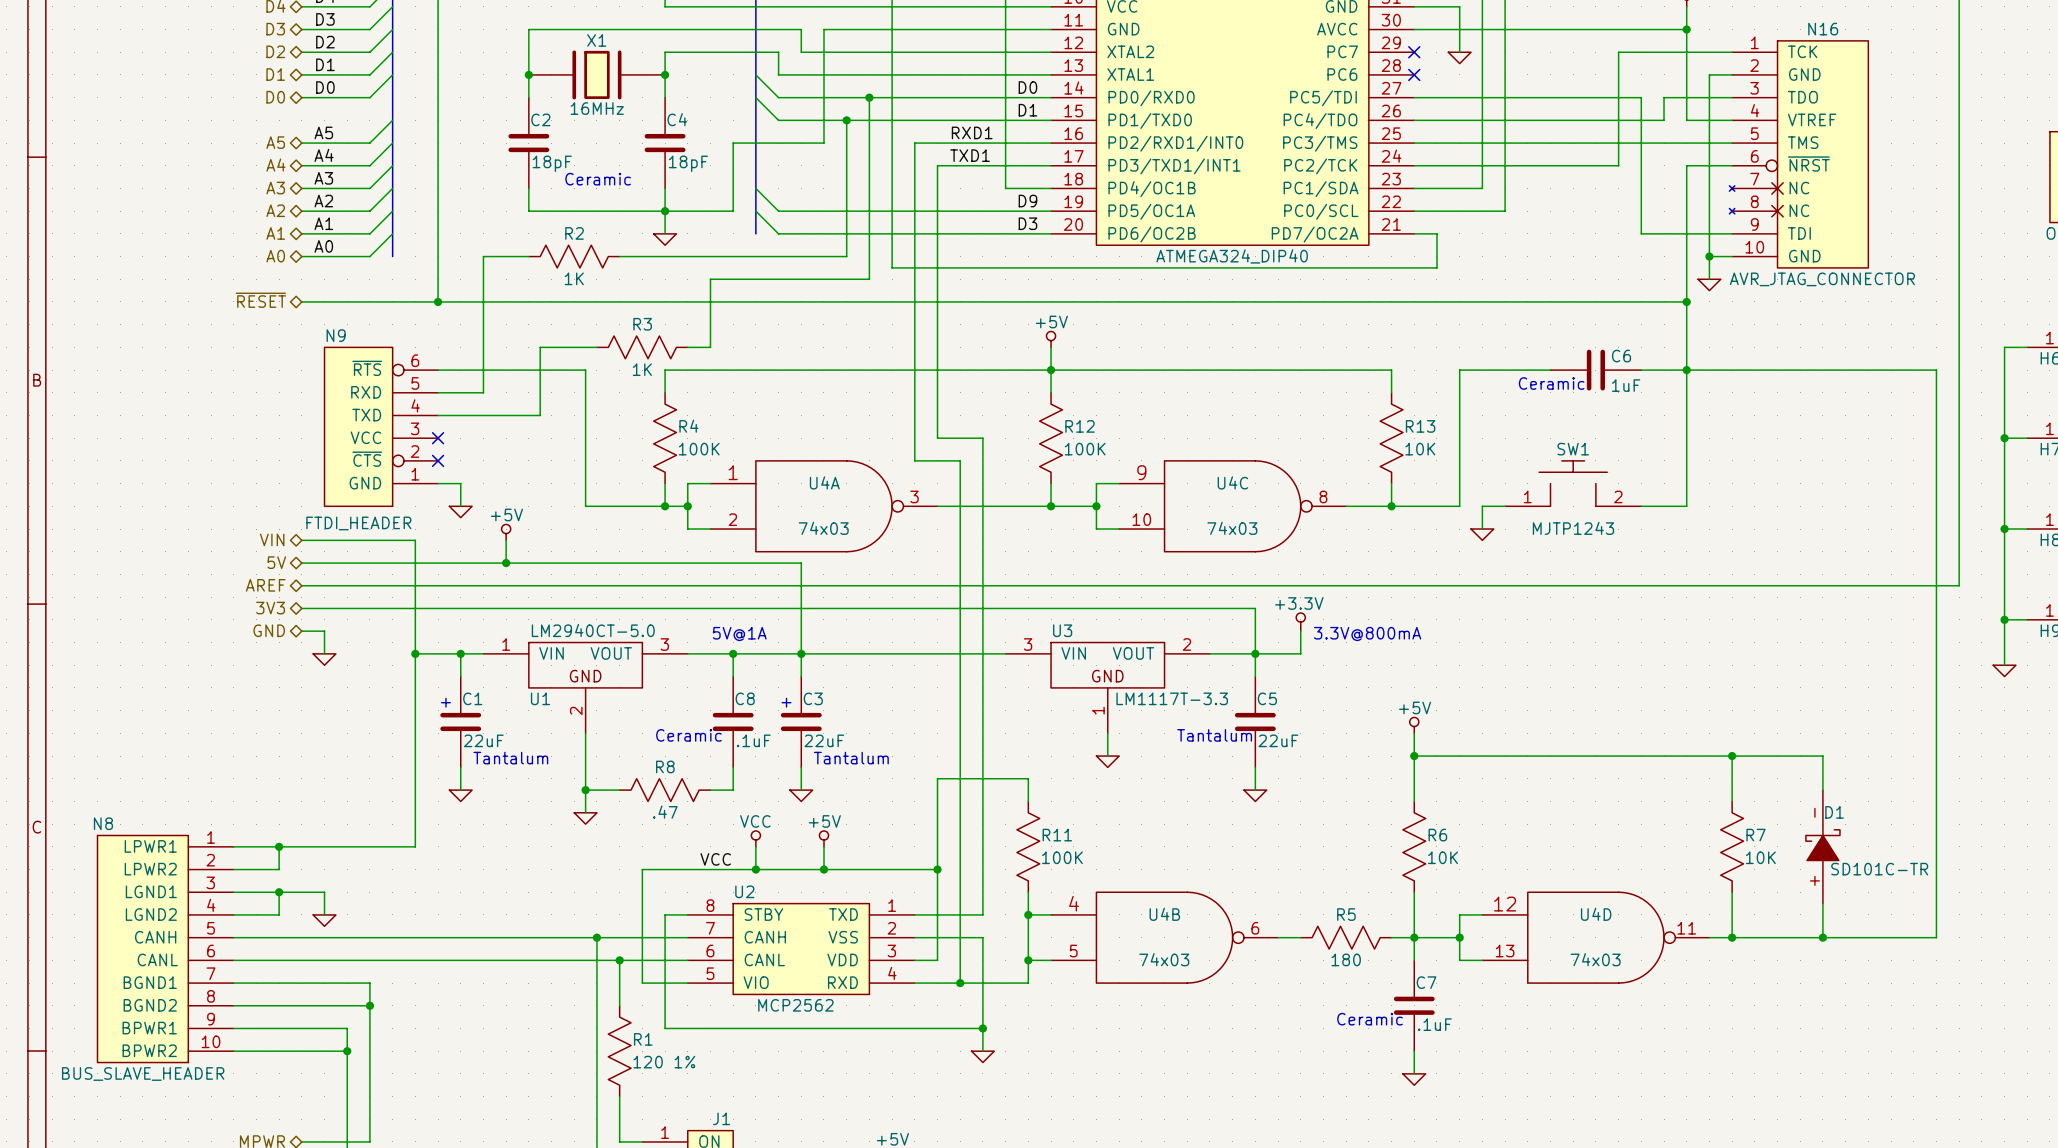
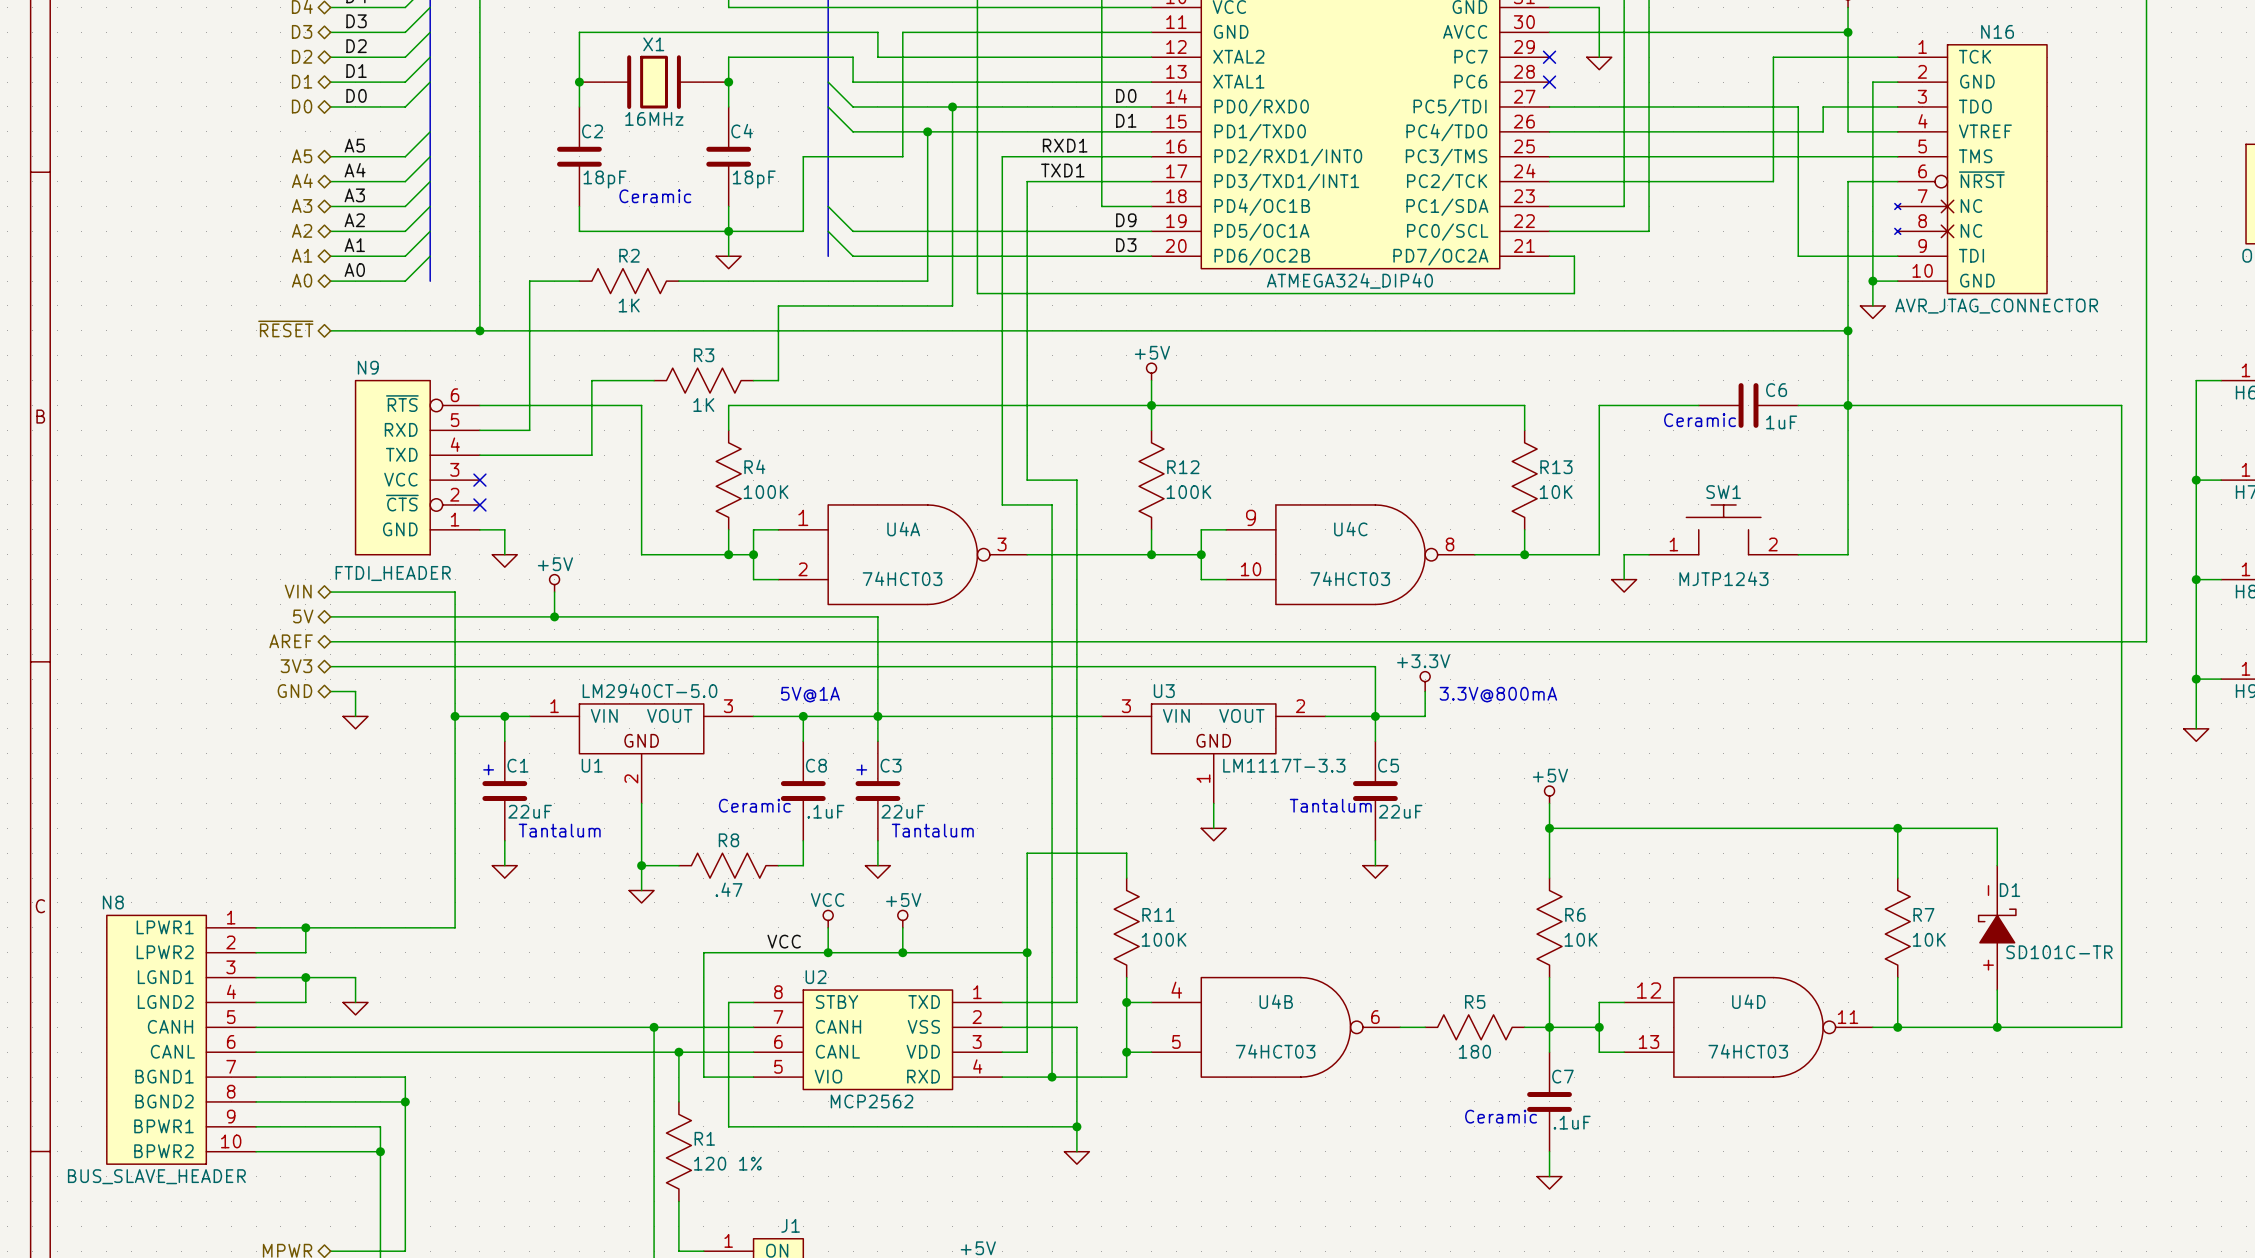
U4A value: 74x03 (823, 528) -> 74HCT03 (902, 578)
U4C value: 74x03 (1232, 528) -> 74HCT03 (1350, 578)
U4B value: 74x03 (1164, 959) -> 74HCT03 (1275, 1051)
U4D value: 74x03 (1595, 959) -> 74HCT03 (1748, 1051)

